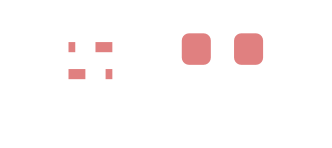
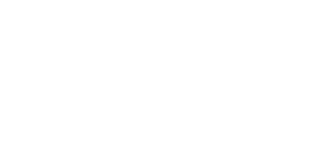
part: (222, 49) -> none
part: (90, 60) -> none

